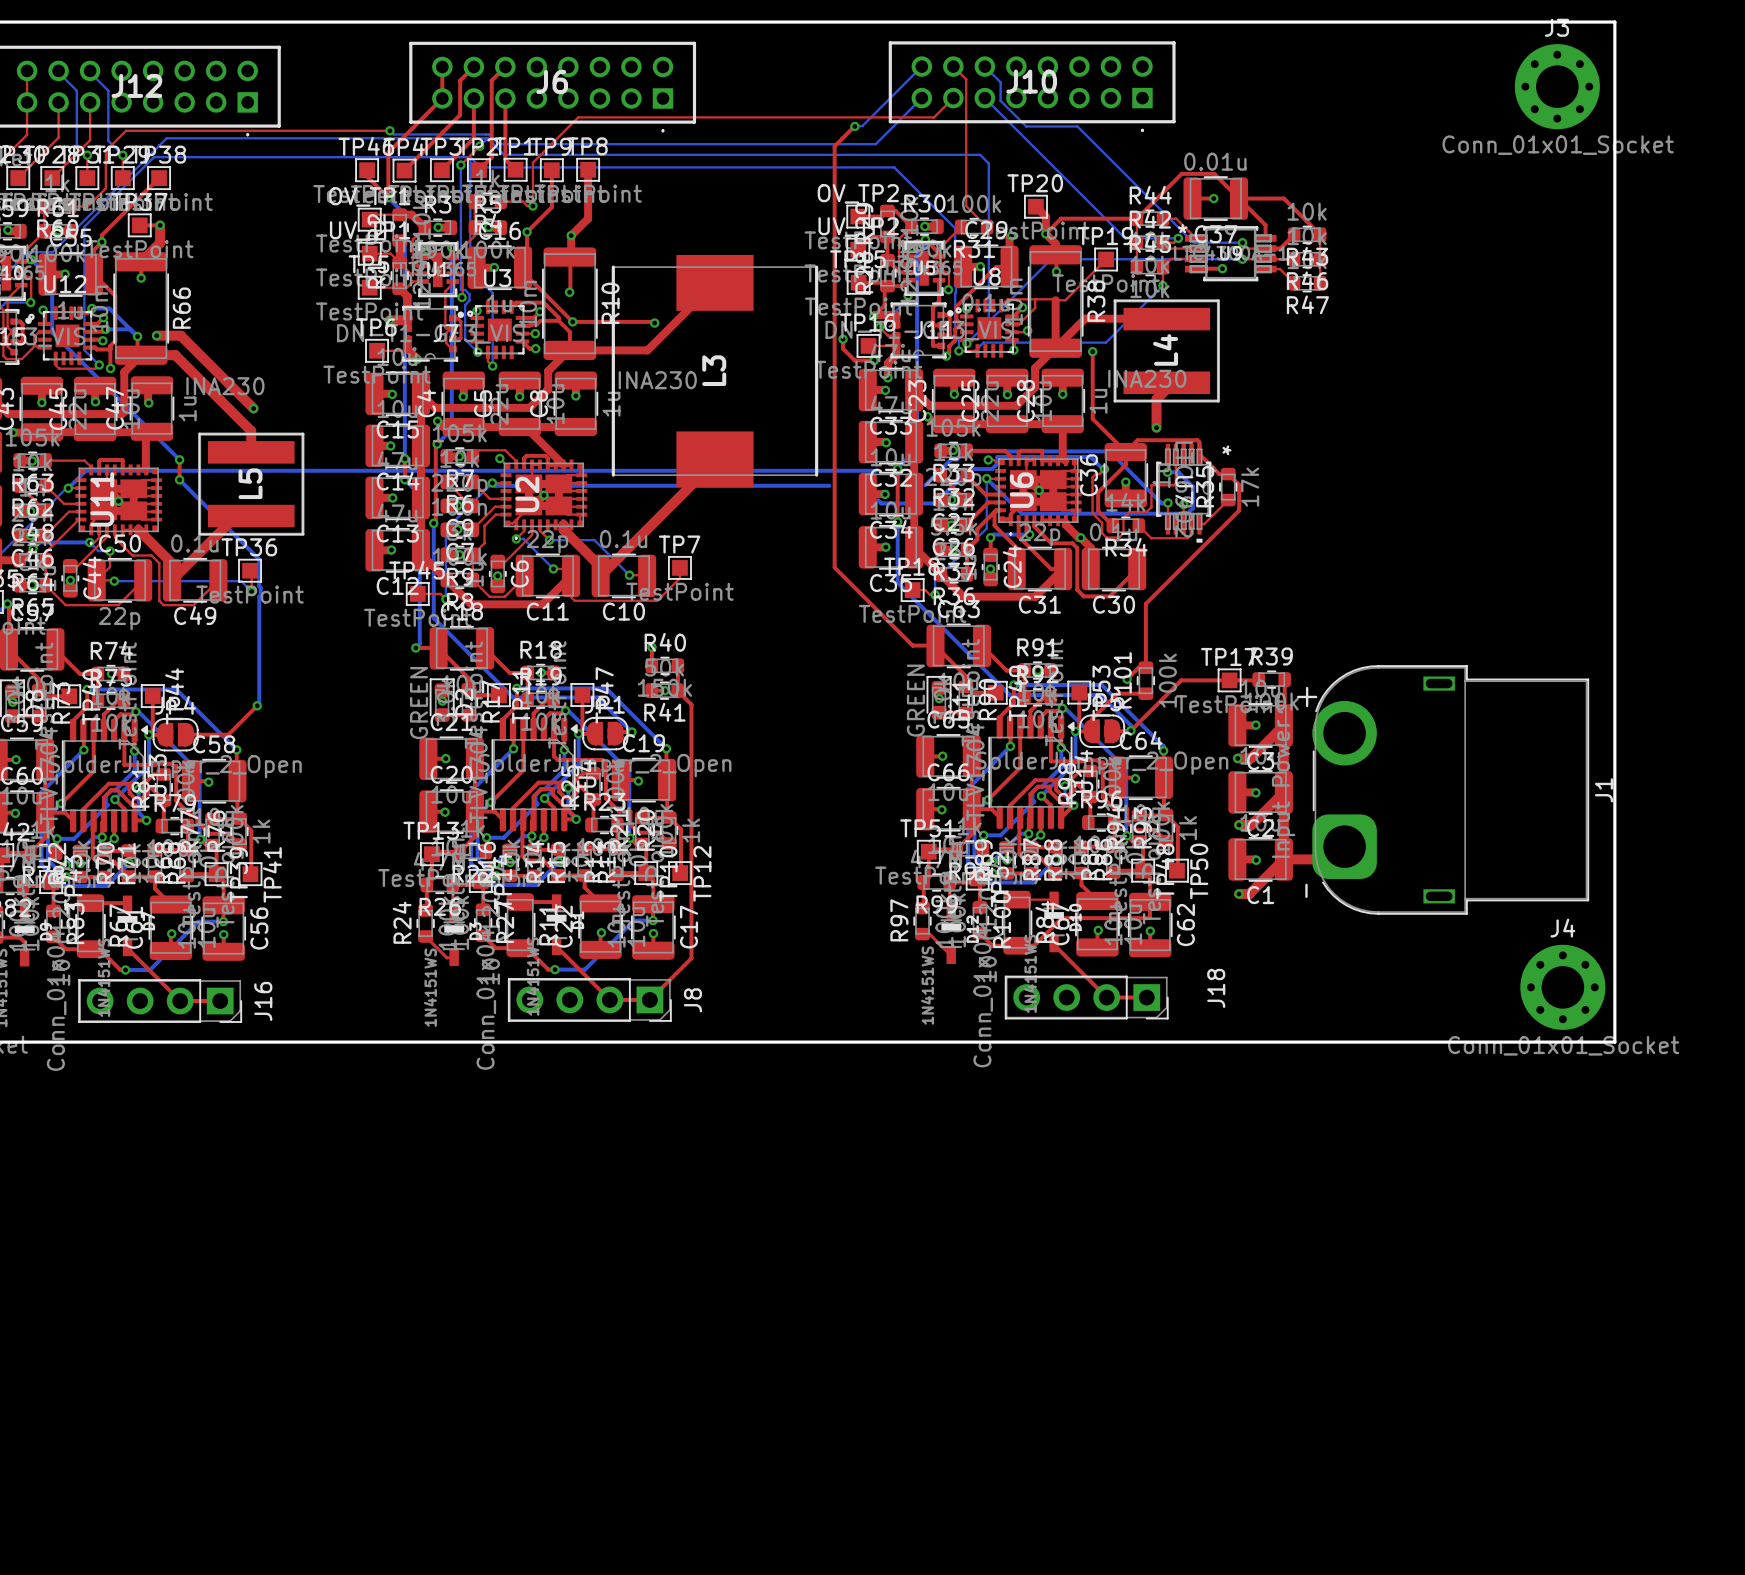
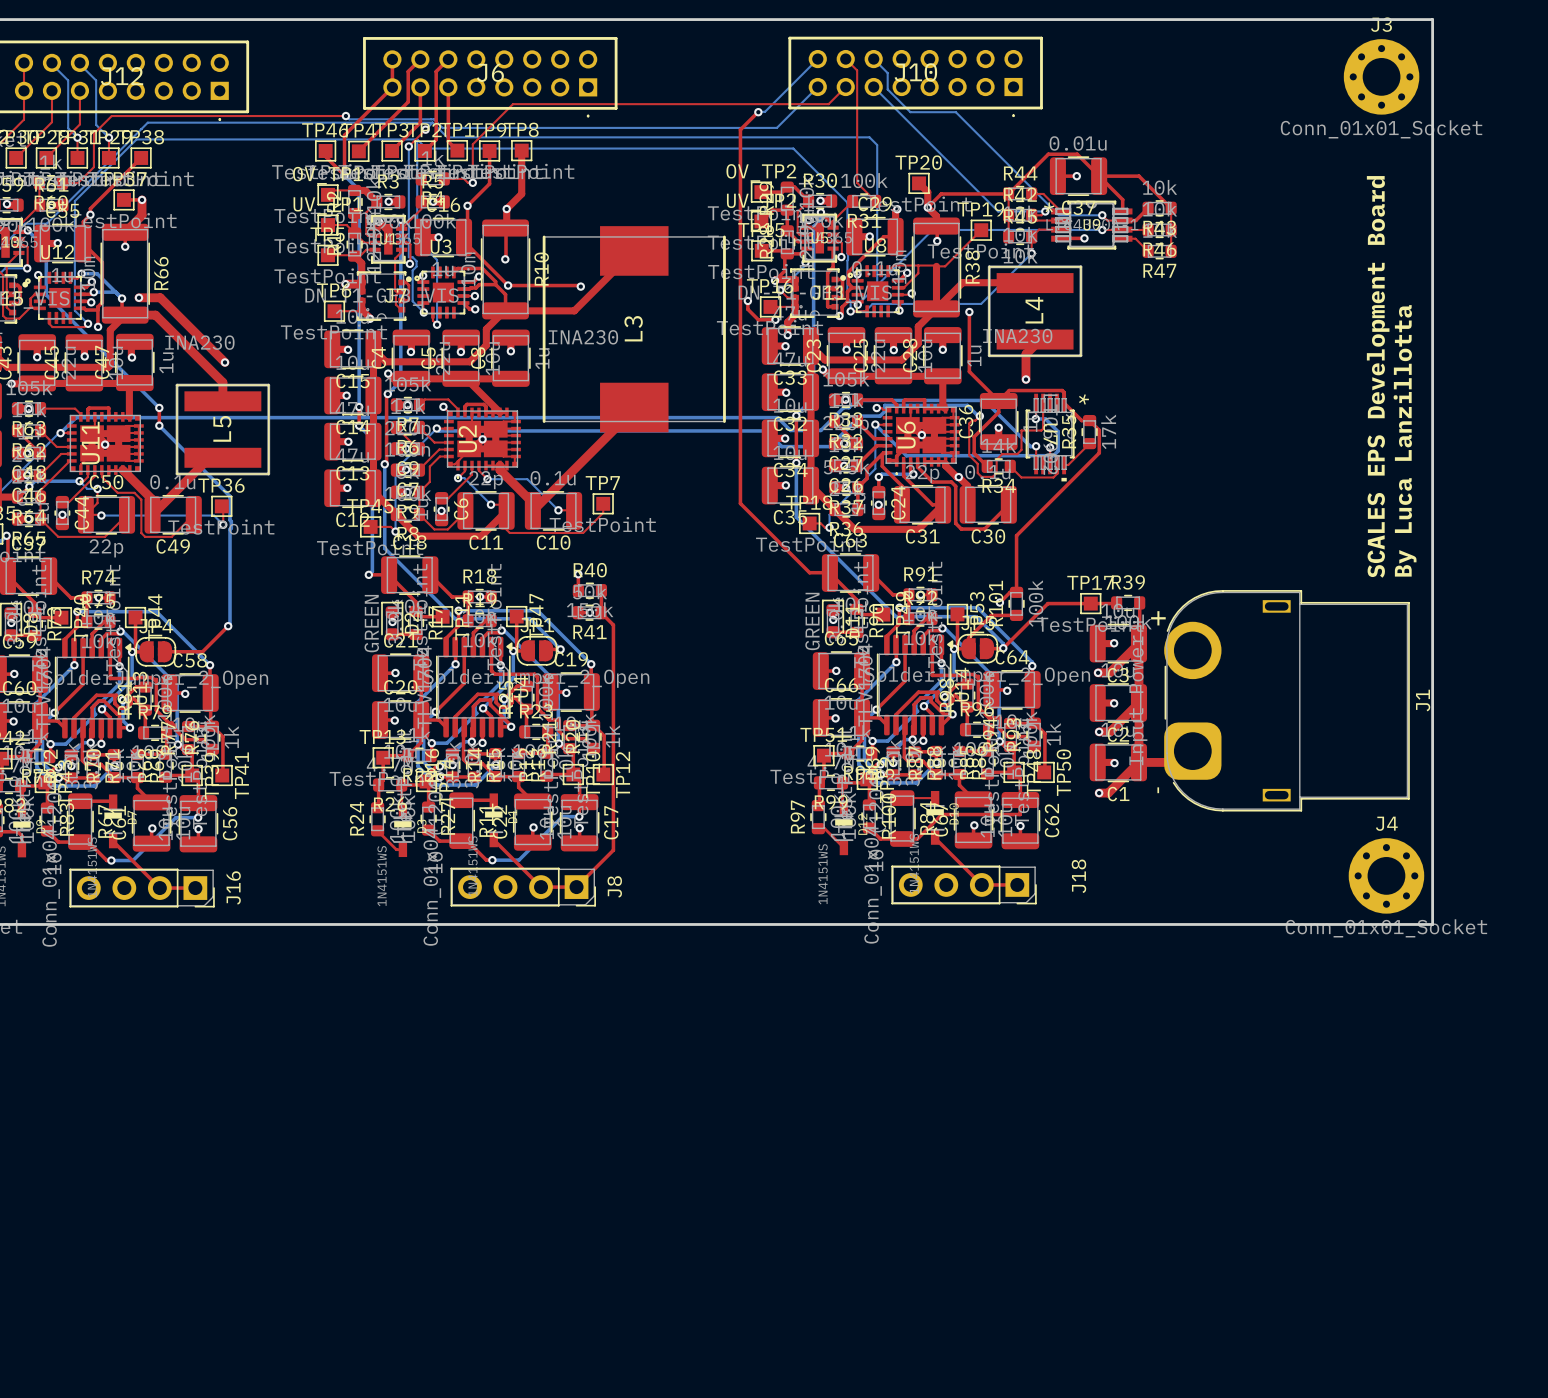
text: none -> SCALES EPS Development Board (1378, 376)
bottom track: none -> (777, 417) (790, 430) (820, 430)
bottom track: none -> (735, 430) (766, 430) (778, 443)
text: none -> By Luca Lanzillotta (1405, 440)

